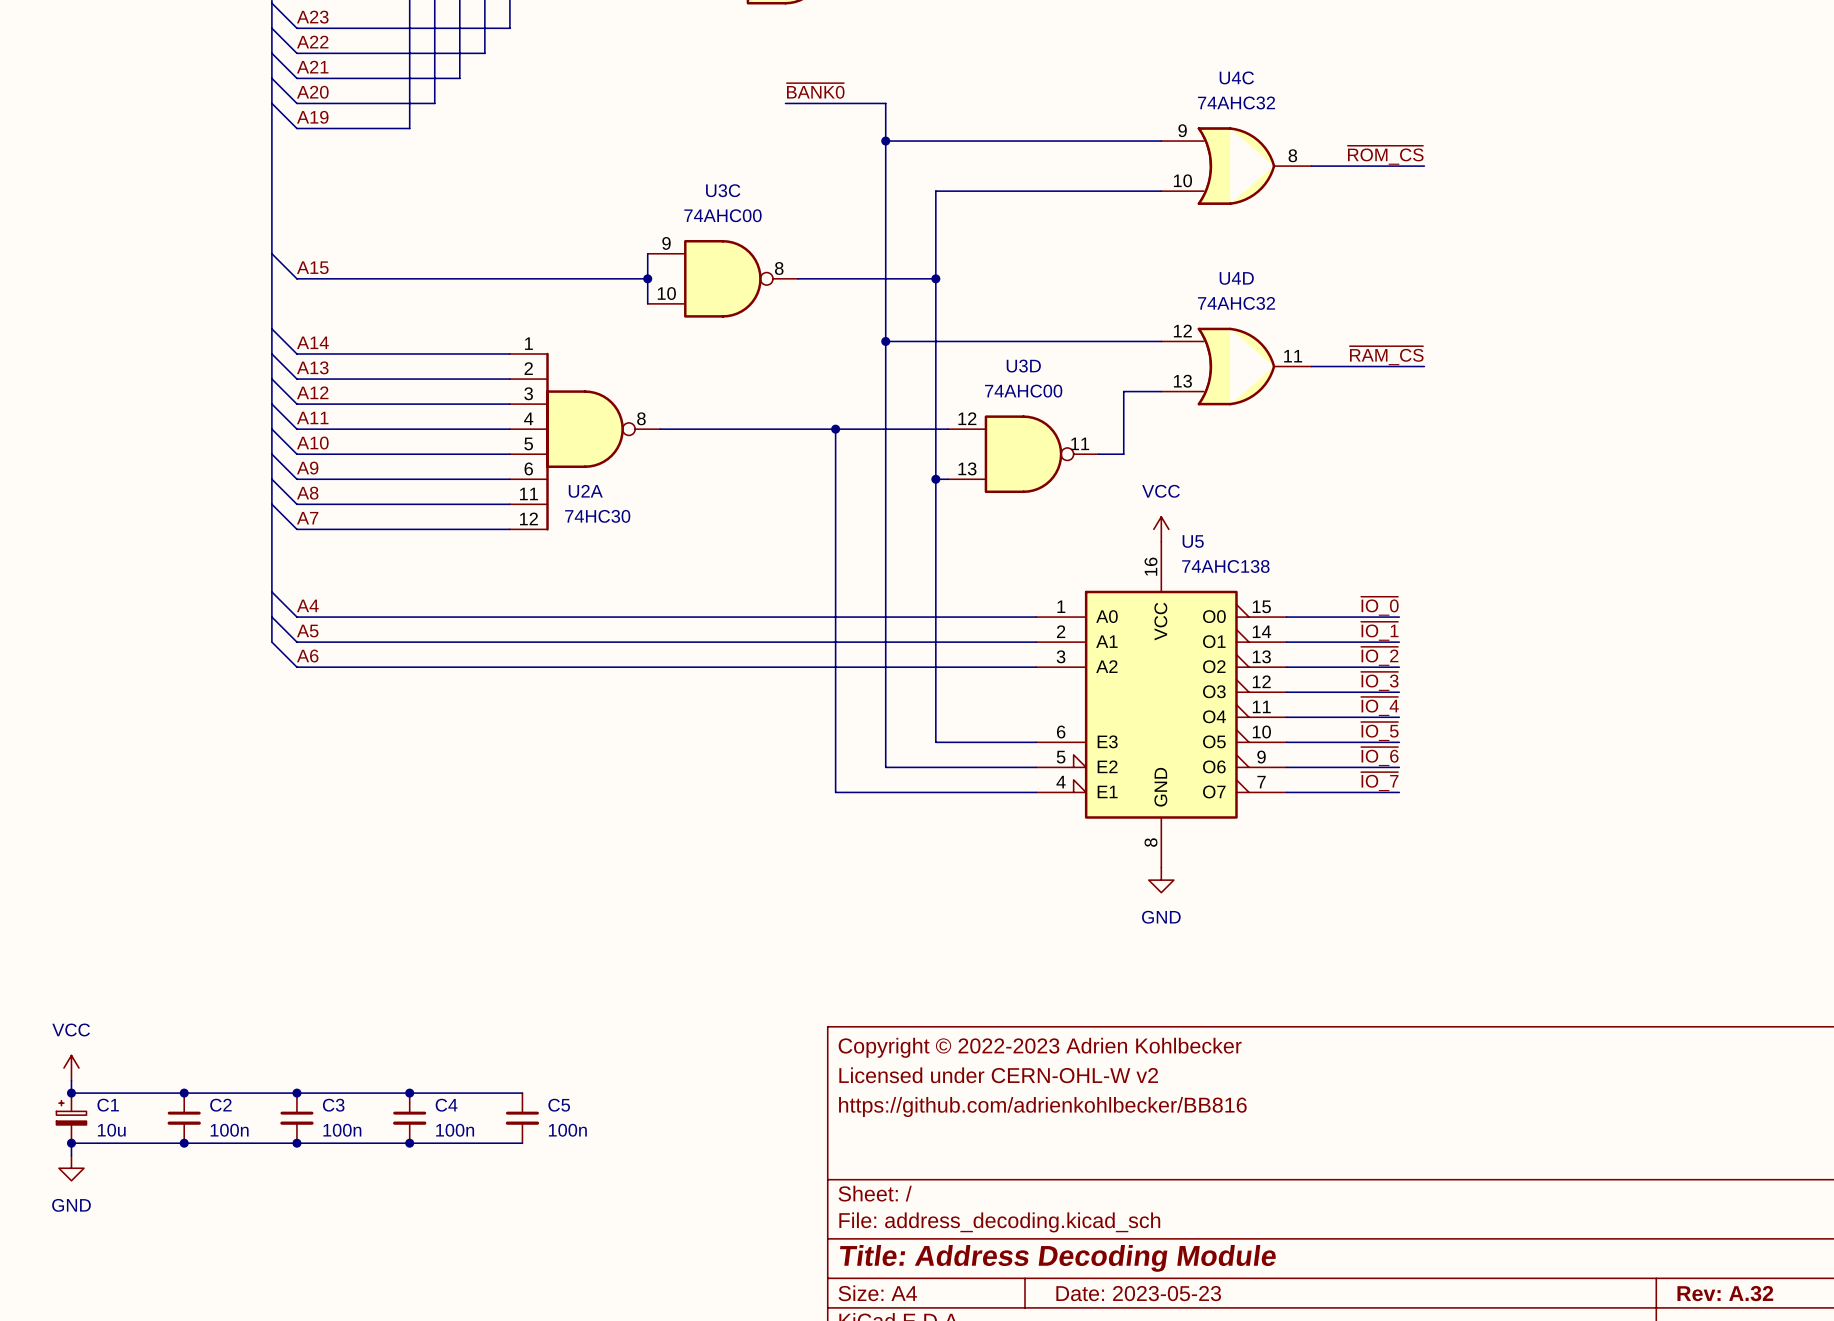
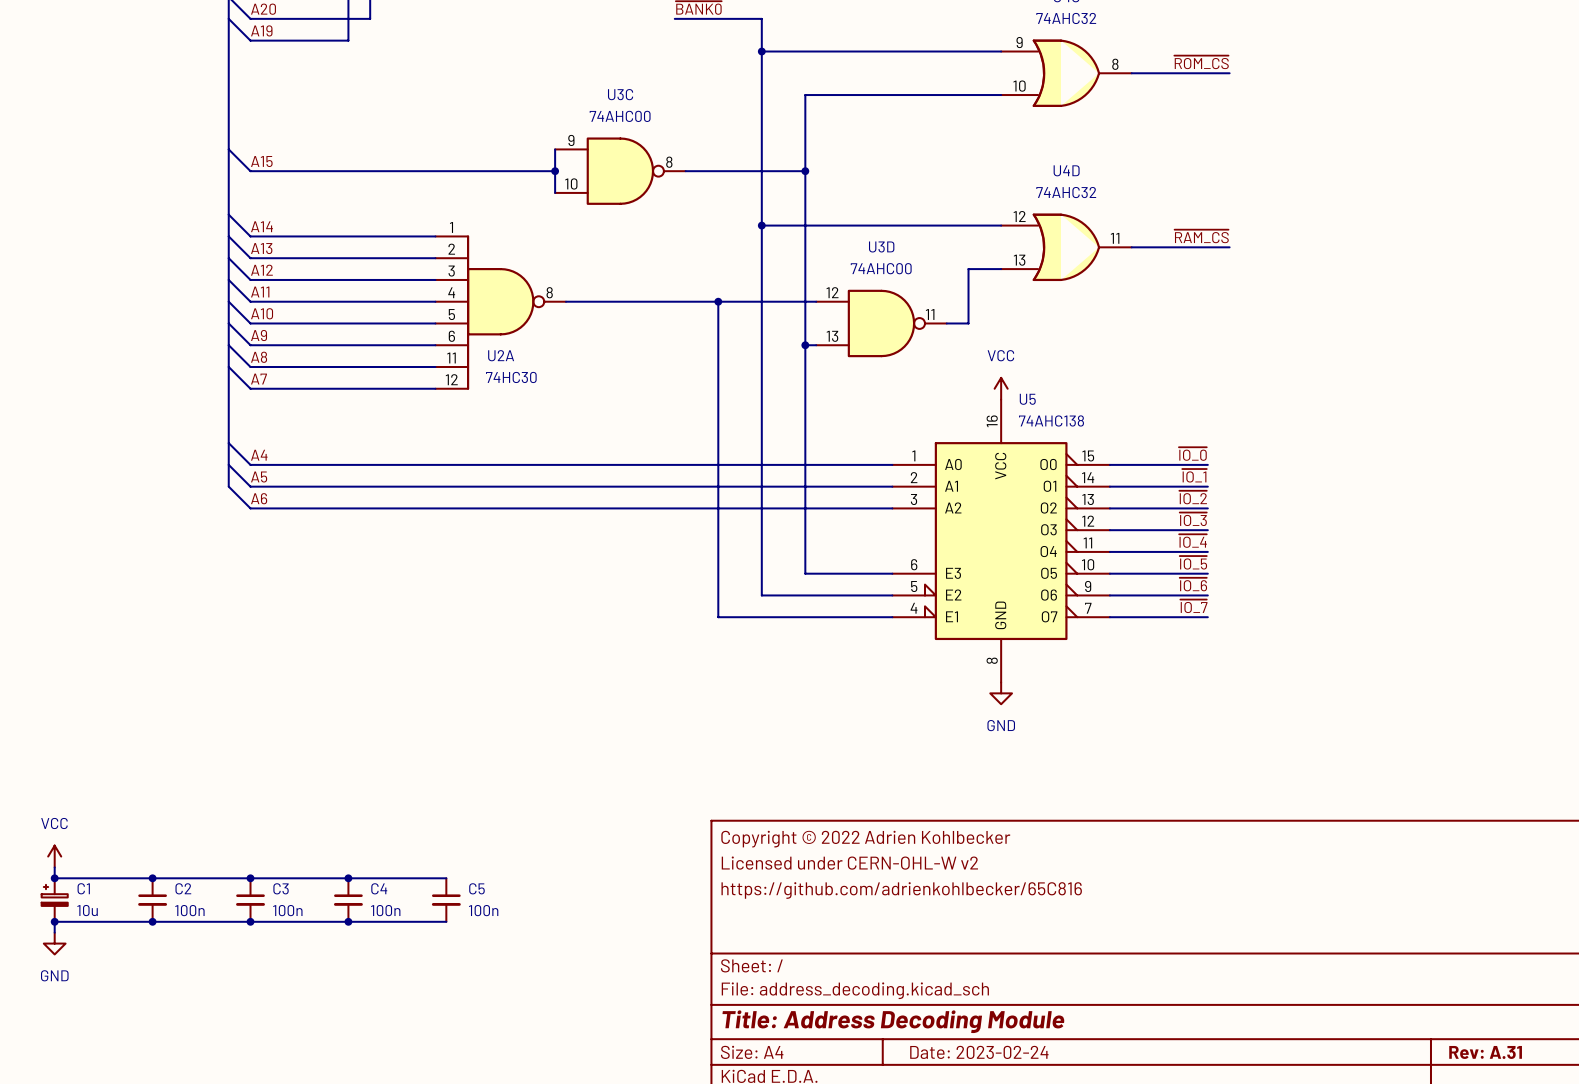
title block: Copyright © 2022-2023 Adrien Kohlbecker (1040, 1047) -> Copyright © 2022 Adrien Kohlbecker (865, 839)
title block: https://github.com/adrienkohlbecker/BB816 (1042, 1107) -> https://github.com/adrienkohlbecker/65C816 (901, 890)
title block: Date: 2023-05-23 (1138, 1293) -> Date: 2023-02-24 (979, 1052)
title block: Rev: A.32 (1725, 1293) -> Rev: A.31 (1485, 1052)

